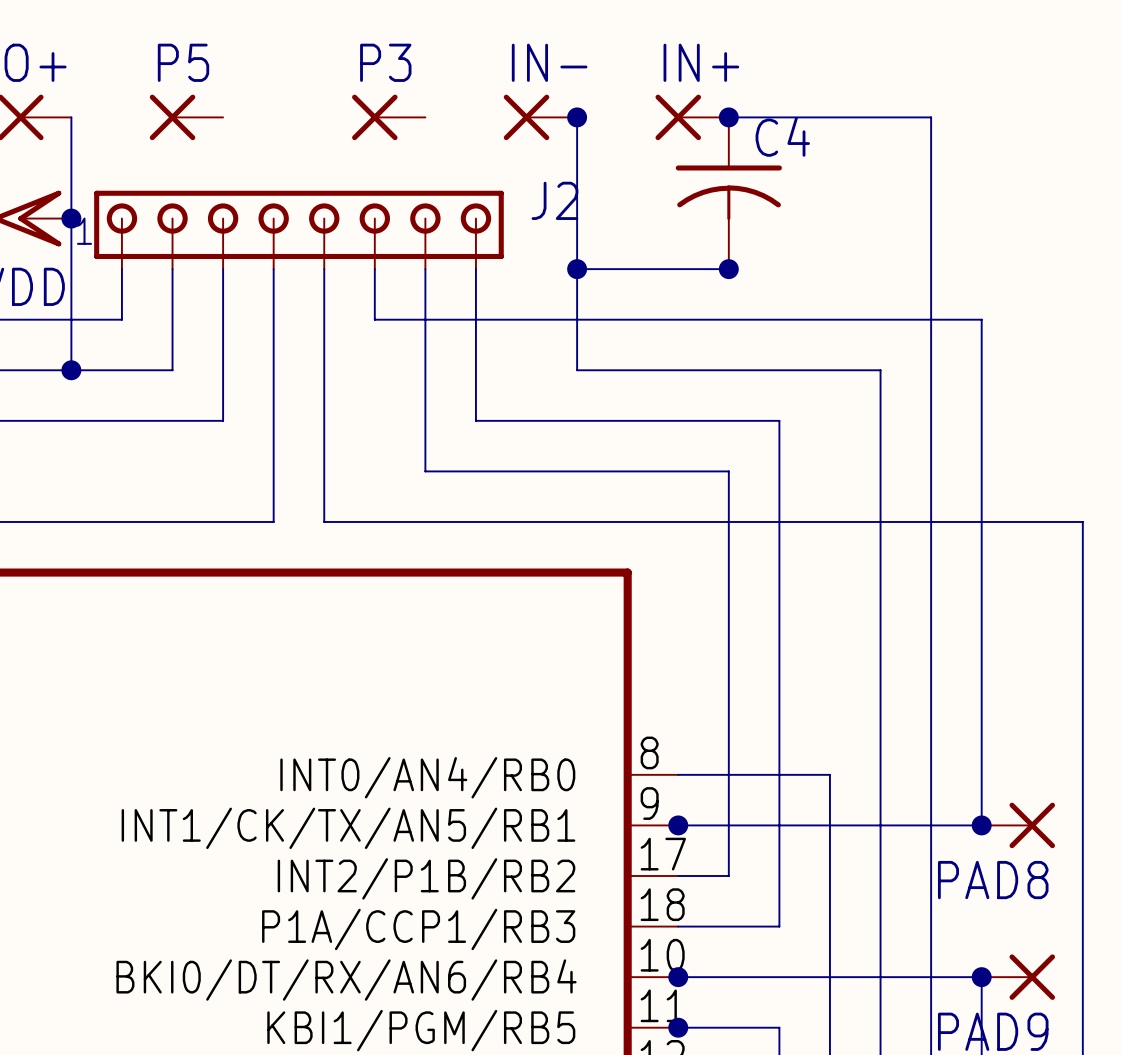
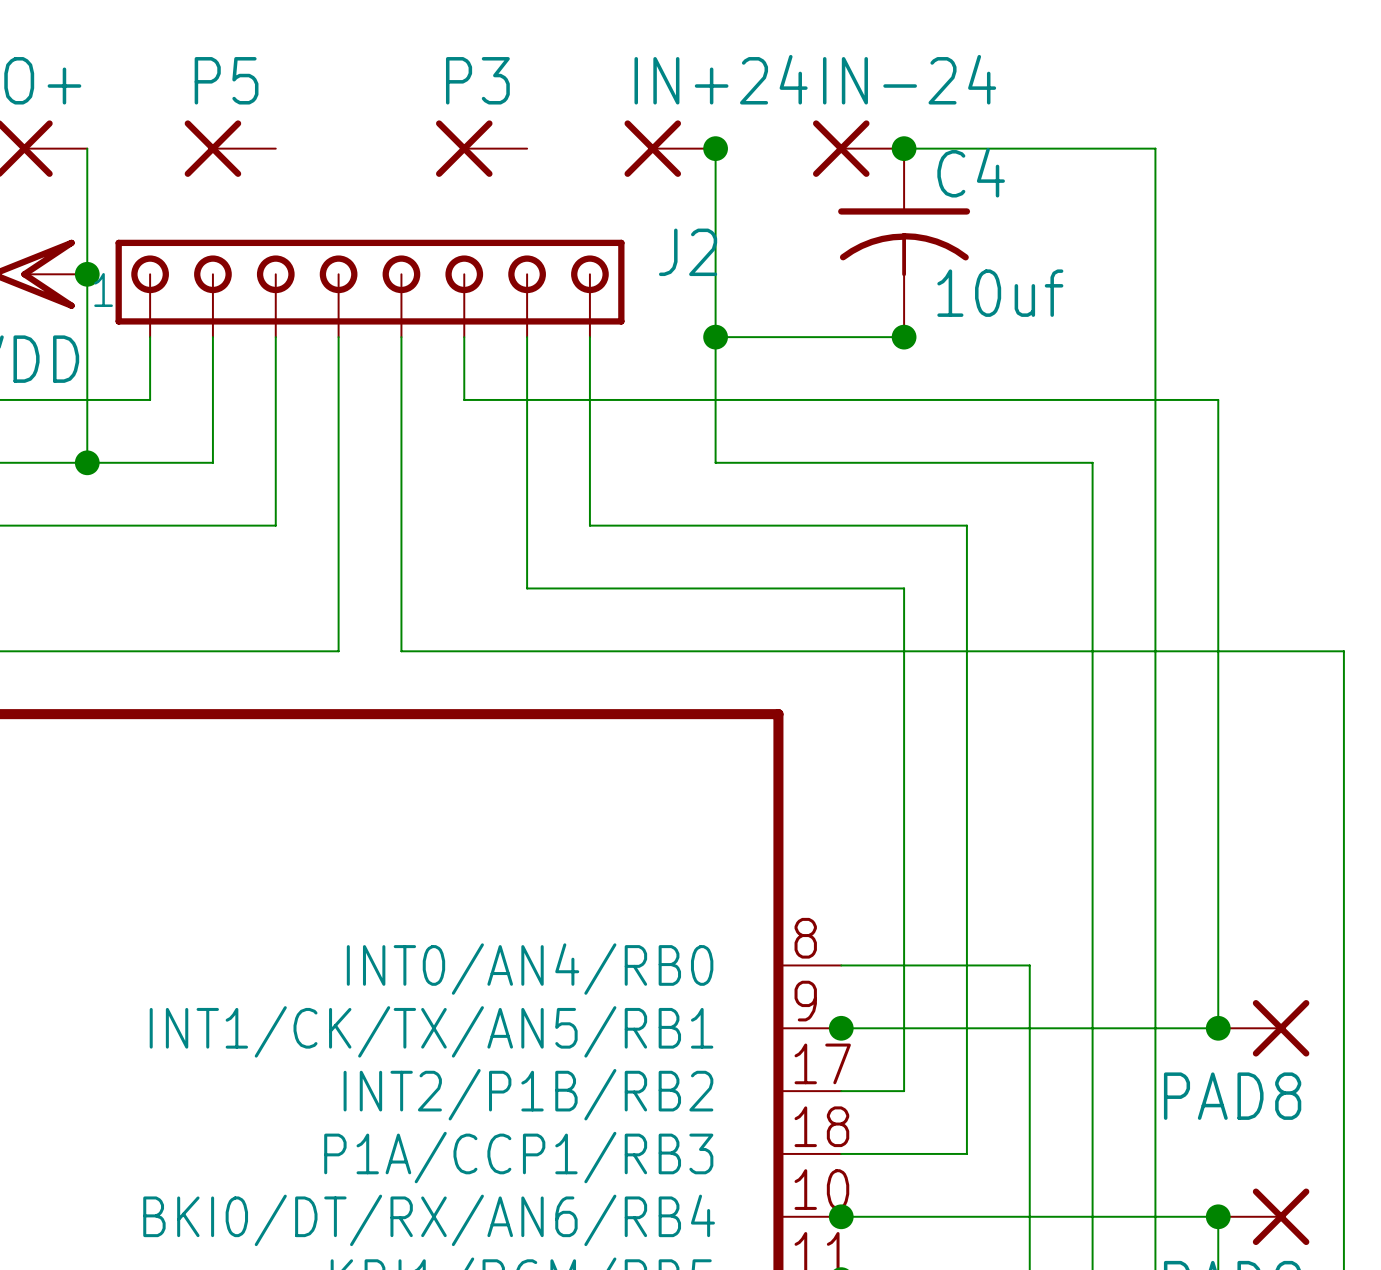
IN- name: IN- (549, 62) -> IN+24 (721, 79)
IN+ name: IN+ (701, 62) -> IN-24 (909, 79)
C4 value: none -> 10uf (1000, 293)

